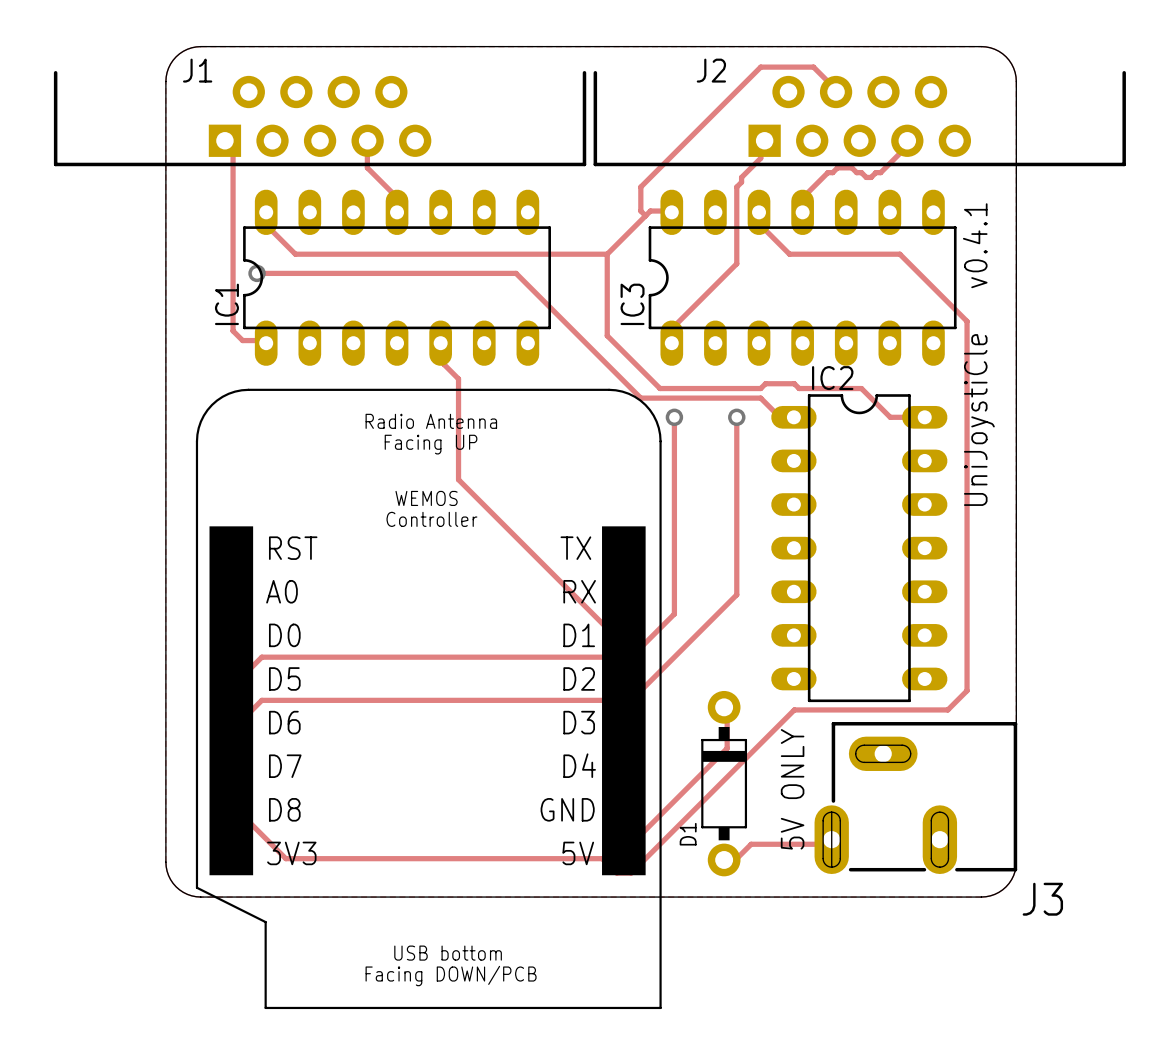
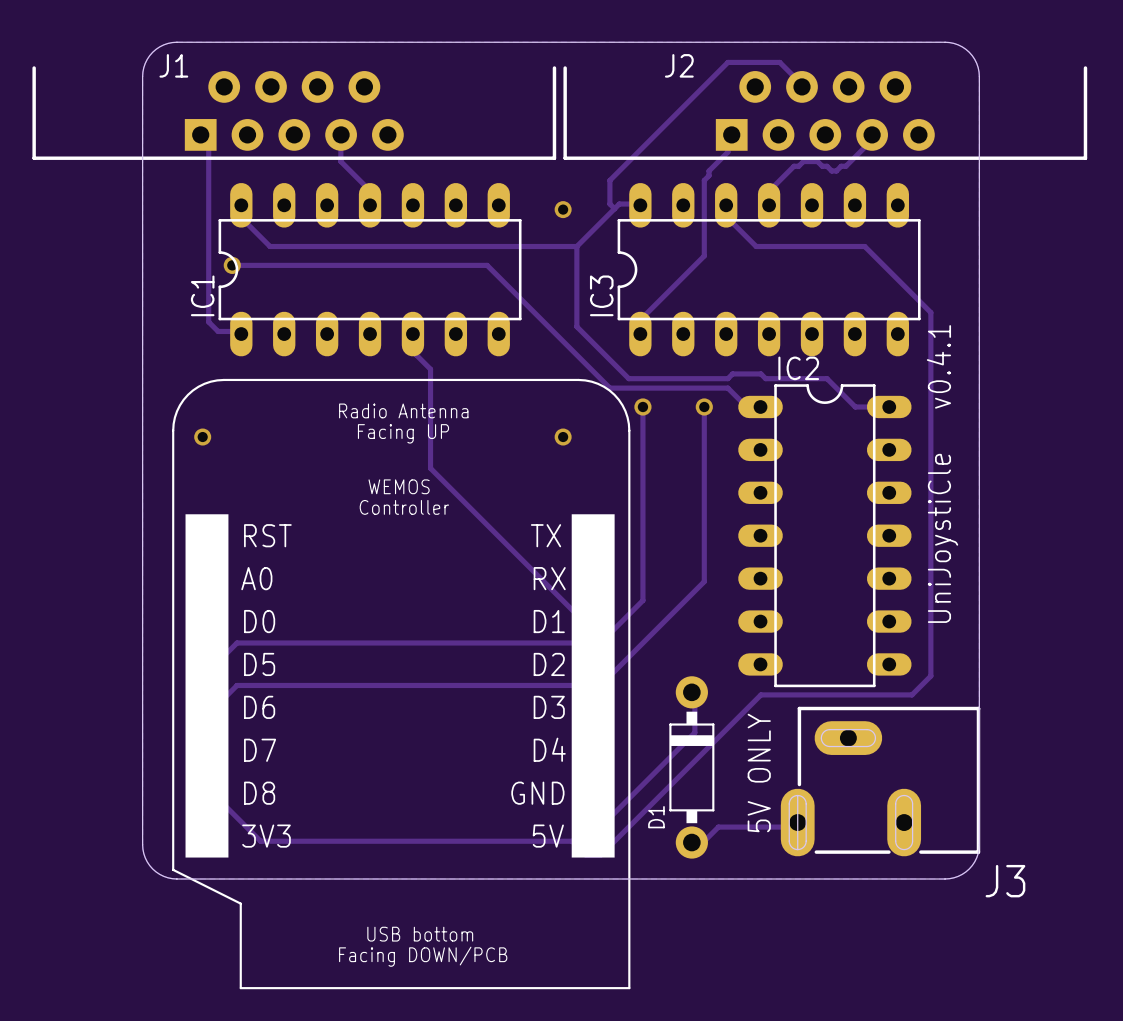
via: none -> (563, 209)
text: v0.4.1 (975, 245) -> none
text: UniJoystiCle (979, 420) -> v0.4.1 (938, 366)
via: none -> (202, 437)
via: none -> (563, 437)
text: none -> UniJoystiCle (943, 538)

